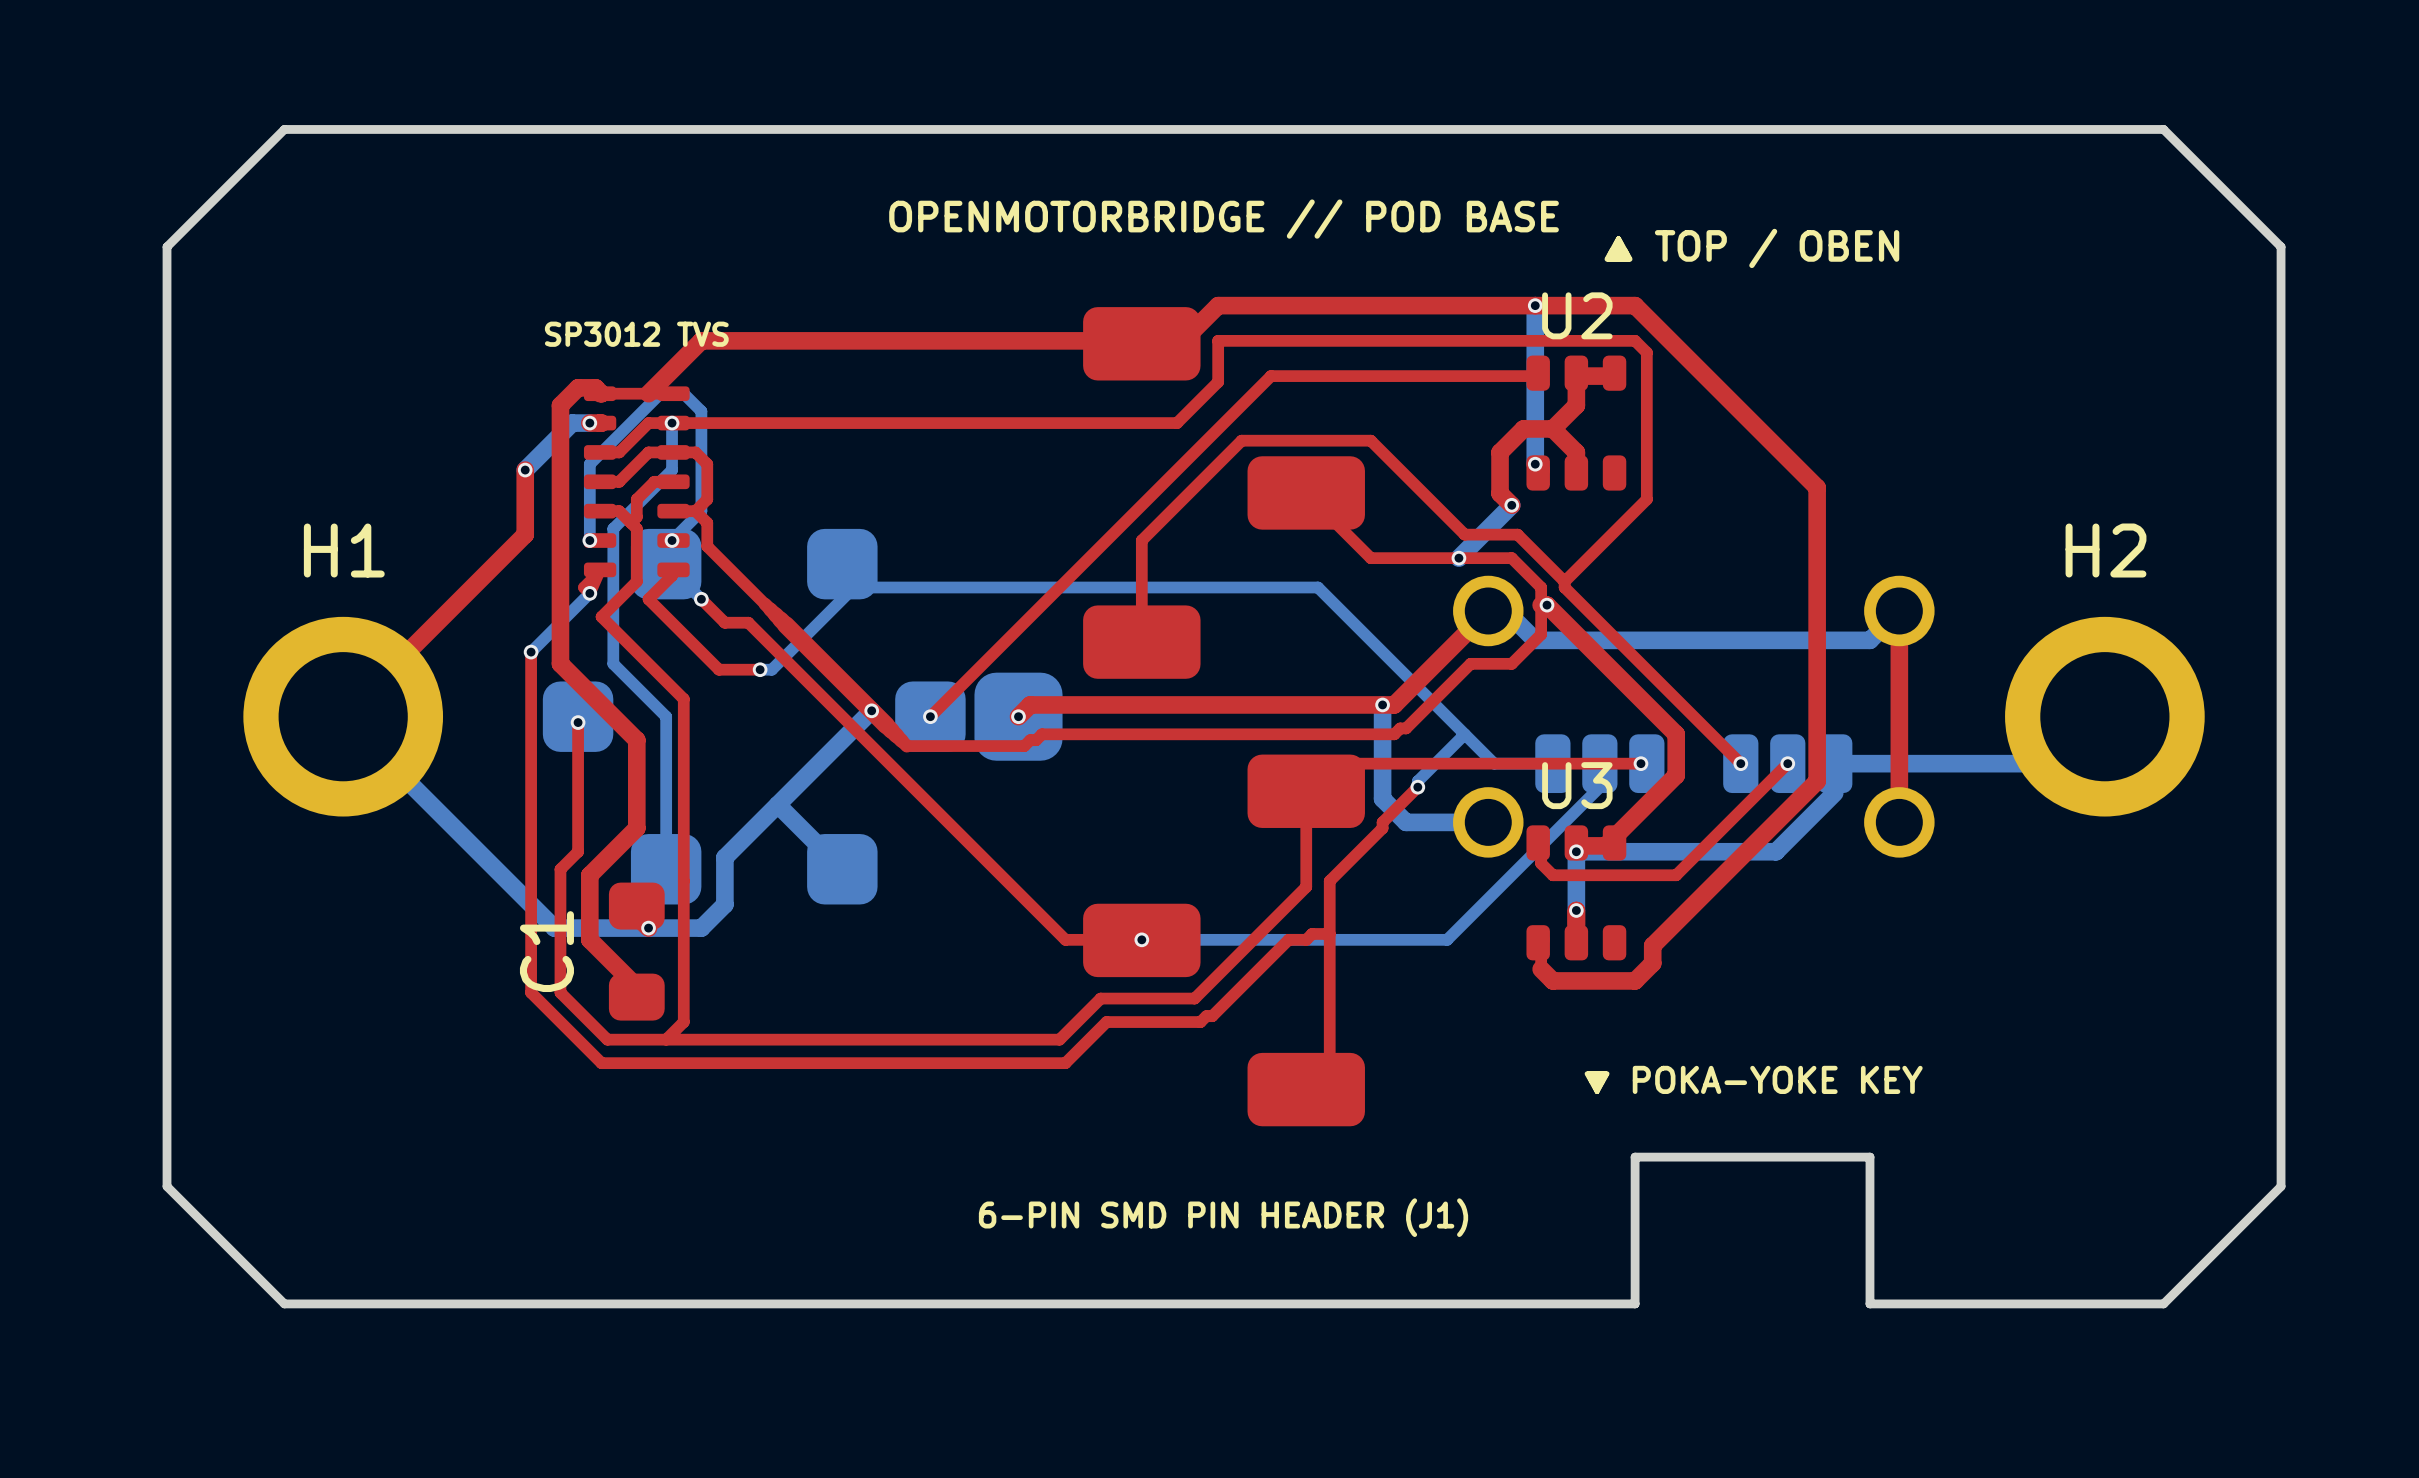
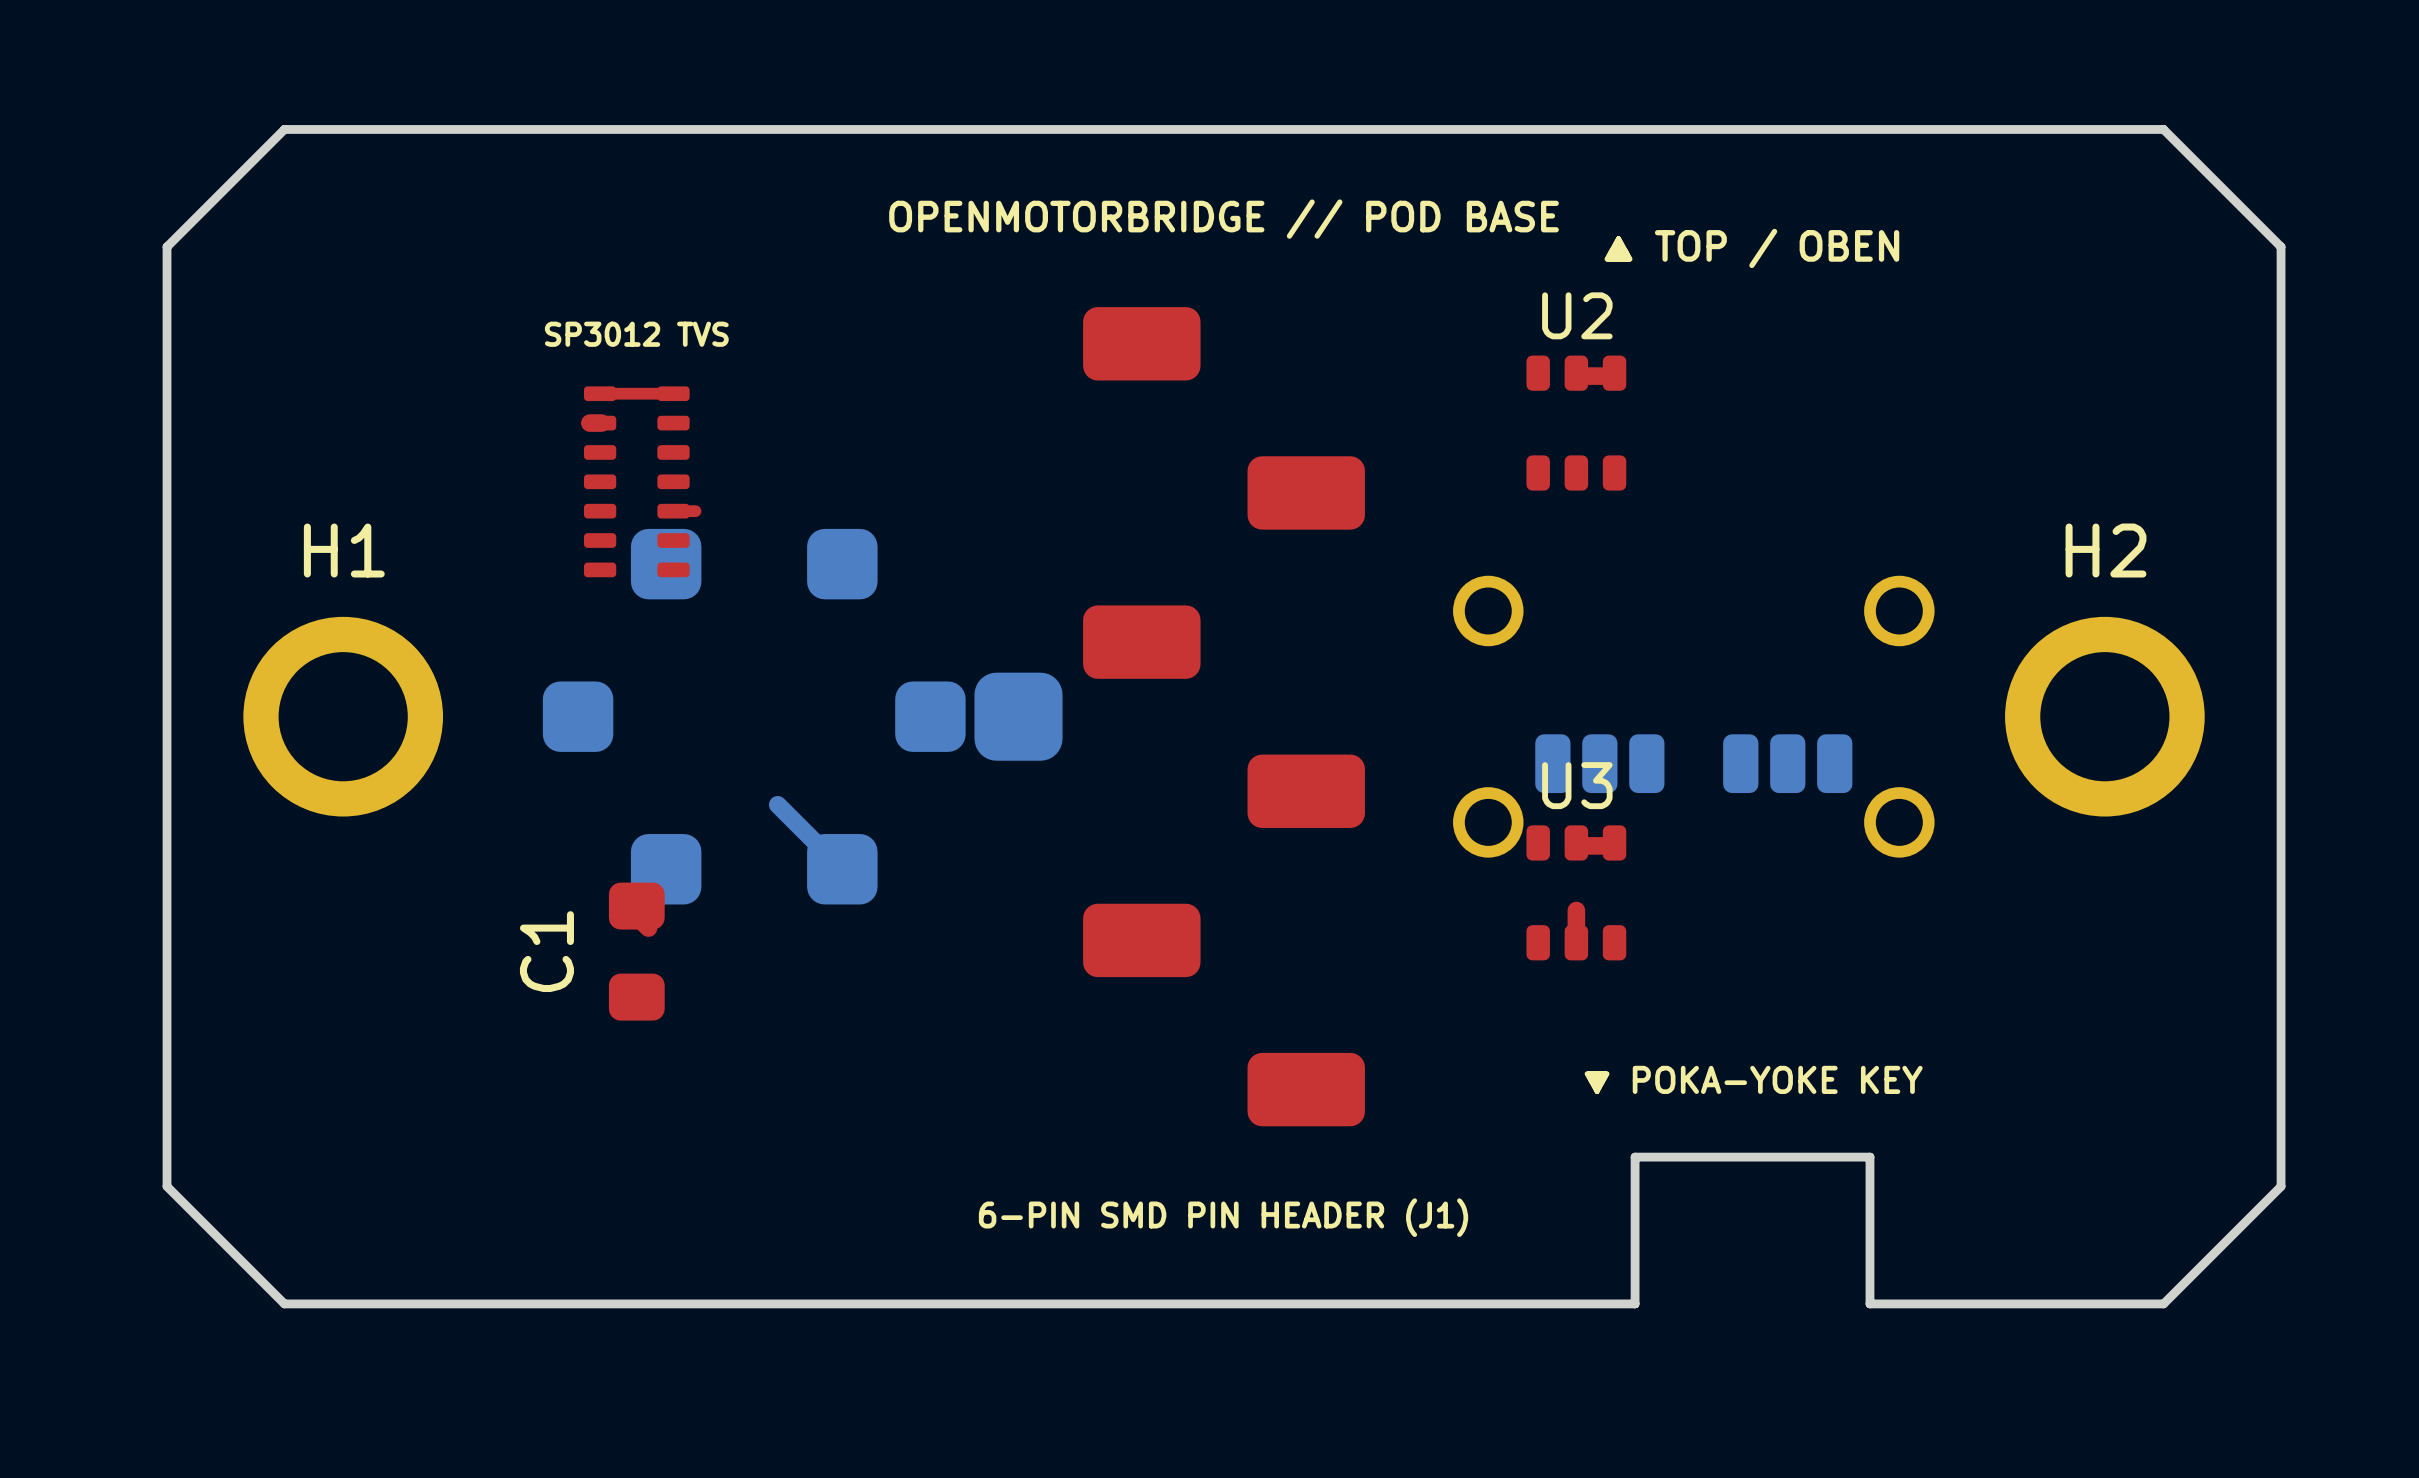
bottom track: (1535, 305) (1535, 464) -> none
via: (1535, 305) -> none
top track: (1141, 340) (1153, 352) (1165, 352) (1182, 334) (1188, 334) (1218, 305) (1635, 305) (1817, 487) (1817, 781) (1652, 945) (1652, 963) (1635, 980) (1552, 980) (1541, 969) (1541, 939) (1538, 942) -> none
top track: (1141, 340) (701, 340) (648, 393) -> none
top track: (1538, 373) (1541, 376) (1271, 376) (930, 716) -> none
top track: (1576, 373) (1576, 405) (1552, 428) -> none
top track: (600, 393) (595, 387) (578, 387) (560, 405) (560, 663) (636, 740) (636, 828) (589, 875) (589, 939) (636, 986) (636, 998) -> none
bottom track: (589, 423) (572, 423) (525, 470) -> none
via: (589, 423) -> none
bottom track: (672, 423) (672, 470) (613, 528) (613, 663) (666, 716) (666, 869) -> none
via: (672, 423) -> none
top track: (1552, 428) (1523, 428) (1500, 452) (1500, 493) (1511, 505) -> none
top track: (1552, 428) (1576, 452) (1576, 472) -> none
top track: (600, 452) (619, 452) (648, 423) (1177, 423) (1218, 381) (1218, 340) (1635, 340) (1646, 352) (1646, 499) (1564, 581) -> none
via: (1535, 464) -> none
top track: (525, 470) (525, 534) (343, 716) -> none
via: (525, 470) -> none
top track: (600, 481) (619, 481) (648, 452) (695, 452) (707, 464) (707, 499) (695, 511) (707, 522) (707, 546) (906, 746) (1024, 746) (1030, 740) (1036, 740) (1041, 734) (1394, 734) (1400, 728) (1406, 728) (1470, 663) (1511, 663) (1541, 634) (1541, 587) (1511, 558) (1370, 558) (1306, 493) -> none
top track: (673, 481) (654, 481) (636, 499) (636, 517) (630, 522) -> none
bottom track: (1511, 505) (1458, 558) -> none
via: (1511, 505) -> none
top track: (600, 511) (619, 511) (636, 528) (636, 581) (601, 616) (683, 699) (683, 1022) (666, 1039) -> none
bottom track: (589, 540) (589, 464) (660, 393) (683, 393) (701, 411) (701, 511) (666, 546) (666, 564) (701, 599) -> none
via: (589, 540) -> none
via: (672, 540) -> none
via: (1458, 558) -> none
bottom track: (842, 564) (865, 587) (1317, 587) (1494, 763) (1552, 763) -> none
top track: (600, 569) (583, 587) (589, 593) (600, 569) -> none
top track: (673, 569) (672, 575) (648, 599) (719, 669) (760, 669) -> none
bottom track: (859, 581) (771, 669) (760, 669) -> none
top track: (1564, 581) (1517, 534) (1464, 534) (1370, 440) (1241, 440) (1141, 540) (1141, 642) -> none
top track: (1564, 581) (1564, 587) (1740, 763) -> none
bottom track: (589, 593) (531, 652) -> none
via: (589, 593) -> none
top track: (701, 599) (724, 622) (748, 622) (1065, 939) (1141, 939) -> none
via: (701, 599) -> none
top track: (1541, 605) (1547, 605) (1676, 734) (1676, 775) (1605, 845) -> none
via: (1547, 605) -> none
top track: (1488, 610) (1394, 704) (1030, 704) (1018, 716) -> none
bottom track: (1488, 610) (1505, 610) (1535, 640) (1869, 640) (1899, 610) -> none
top track: (1899, 610) (1899, 822) -> none
top track: (531, 652) (531, 992) (601, 1063) (1065, 1063) (1106, 1022) (1200, 1022) (1206, 1016) (1212, 1016) (1288, 939) (1306, 939) (1312, 933) (1329, 933) -> none
via: (531, 652) -> none
via: (760, 669) -> none
bottom track: (1382, 704) (1382, 798) (1406, 822) (1488, 822) -> none
via: (1382, 704) -> none
bottom track: (871, 710) (724, 857) (724, 904) (701, 928) (554, 928) (343, 716) -> none
via: (871, 710) -> none
via: (930, 716) -> none
via: (1018, 716) -> none
bottom track: (2104, 716) (2057, 763) (1834, 763) -> none
top track: (578, 722) (578, 851) (560, 869) (560, 992) (607, 1039) (1059, 1039) (1100, 998) (1194, 998) (1306, 886) (1306, 791) -> none
via: (578, 722) -> none
bottom track: (1464, 734) (1417, 781) (1417, 787) -> none
bottom track: (1599, 763) (1599, 787) (1447, 939) (1141, 939) -> none
top track: (1640, 763) (1335, 763) (1306, 793) -> none
via: (1640, 763) -> none
via: (1740, 763) -> none
top track: (1787, 763) (1676, 875) (1552, 875) (1541, 863) (1541, 845) (1538, 842) -> none
via: (1787, 763) -> none
top track: (1417, 787) (1382, 822) (1382, 828) (1329, 881) (1329, 1069) (1306, 1092) (1306, 1089) -> none
via: (1417, 787) -> none
bottom track: (1834, 793) (1776, 851) (1576, 851) (1576, 910) -> none
via: (1576, 851) -> none
via: (1576, 910) -> none
via: (648, 928) -> none
via: (1141, 939) -> none

